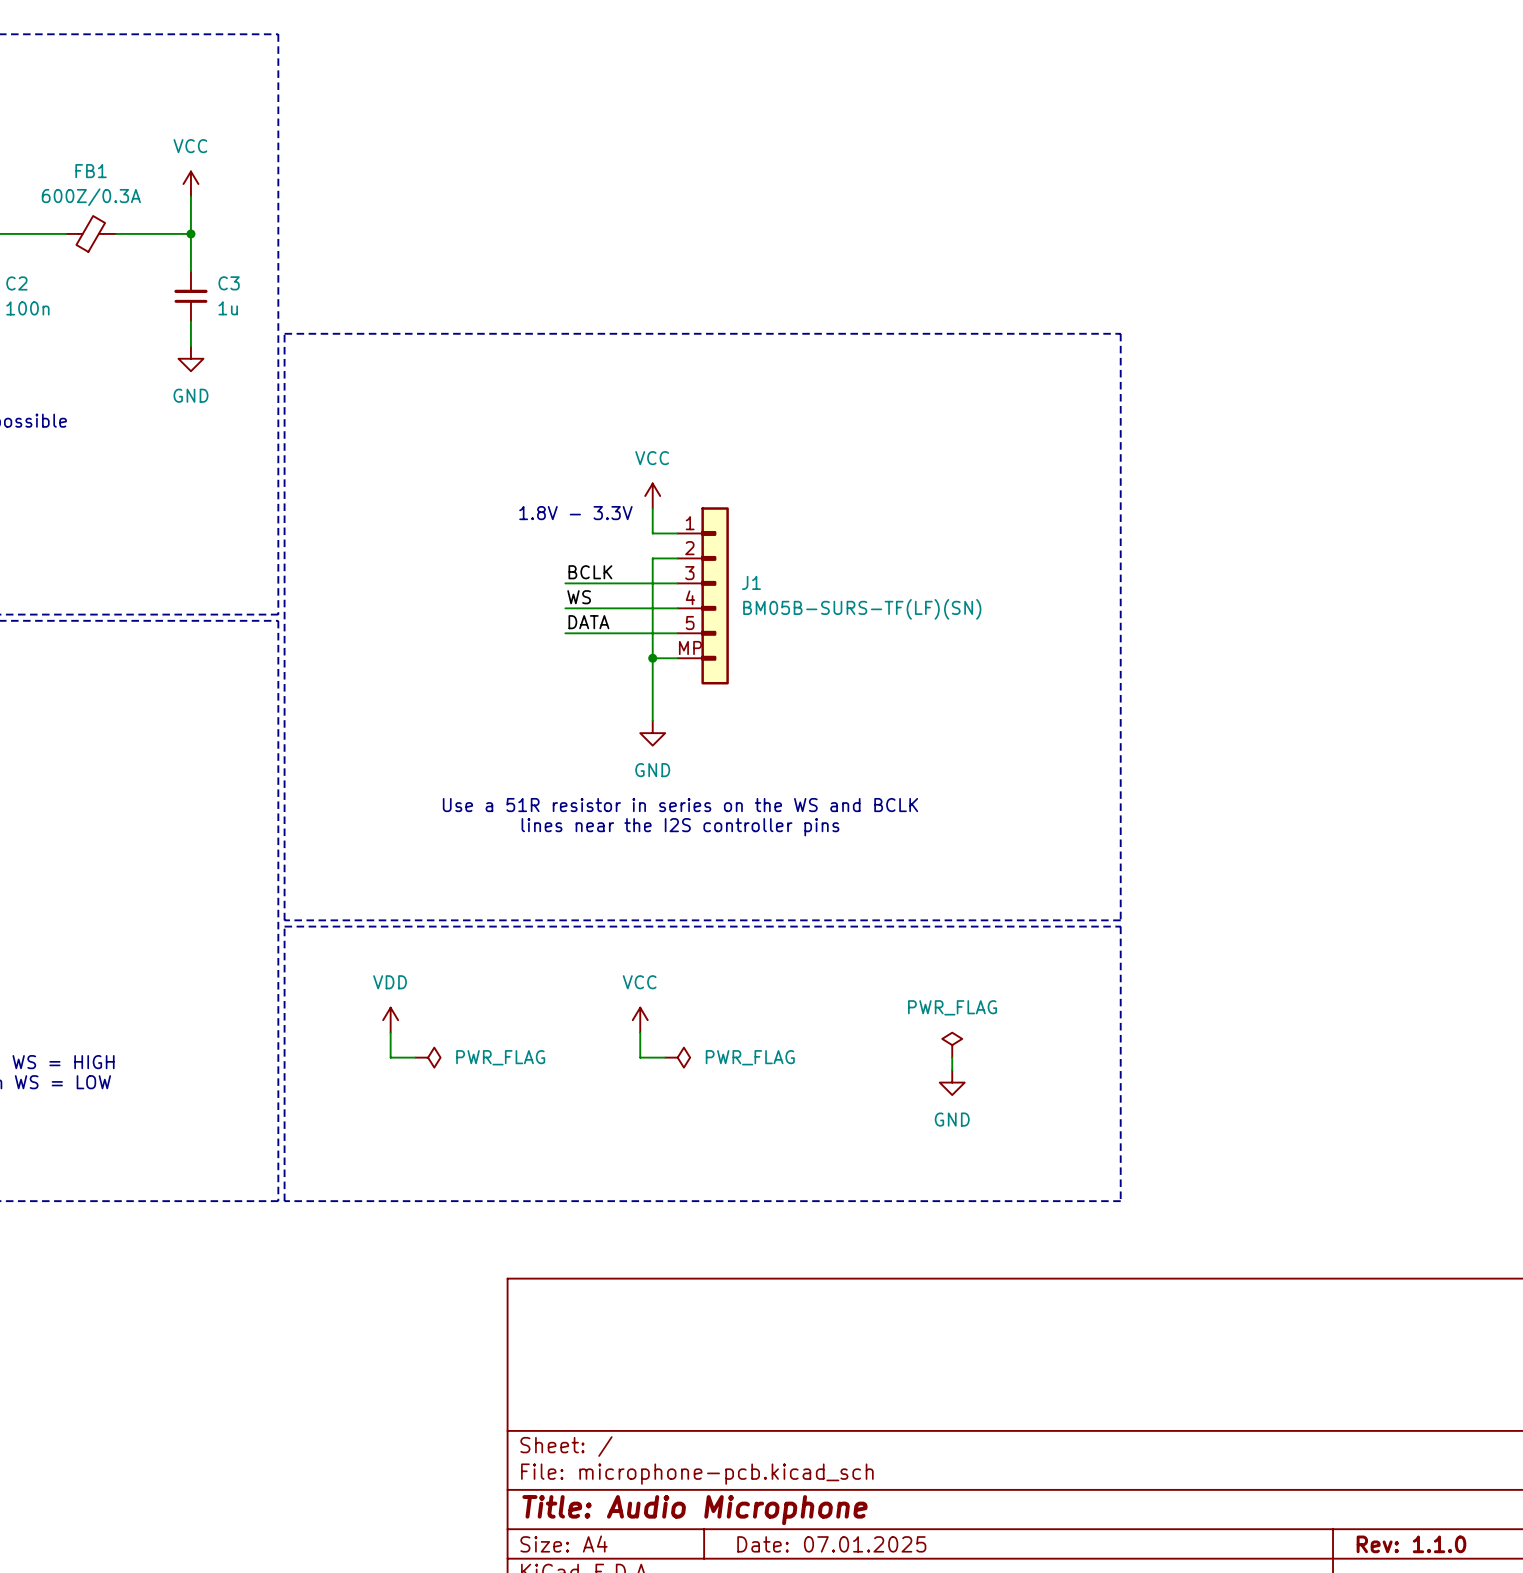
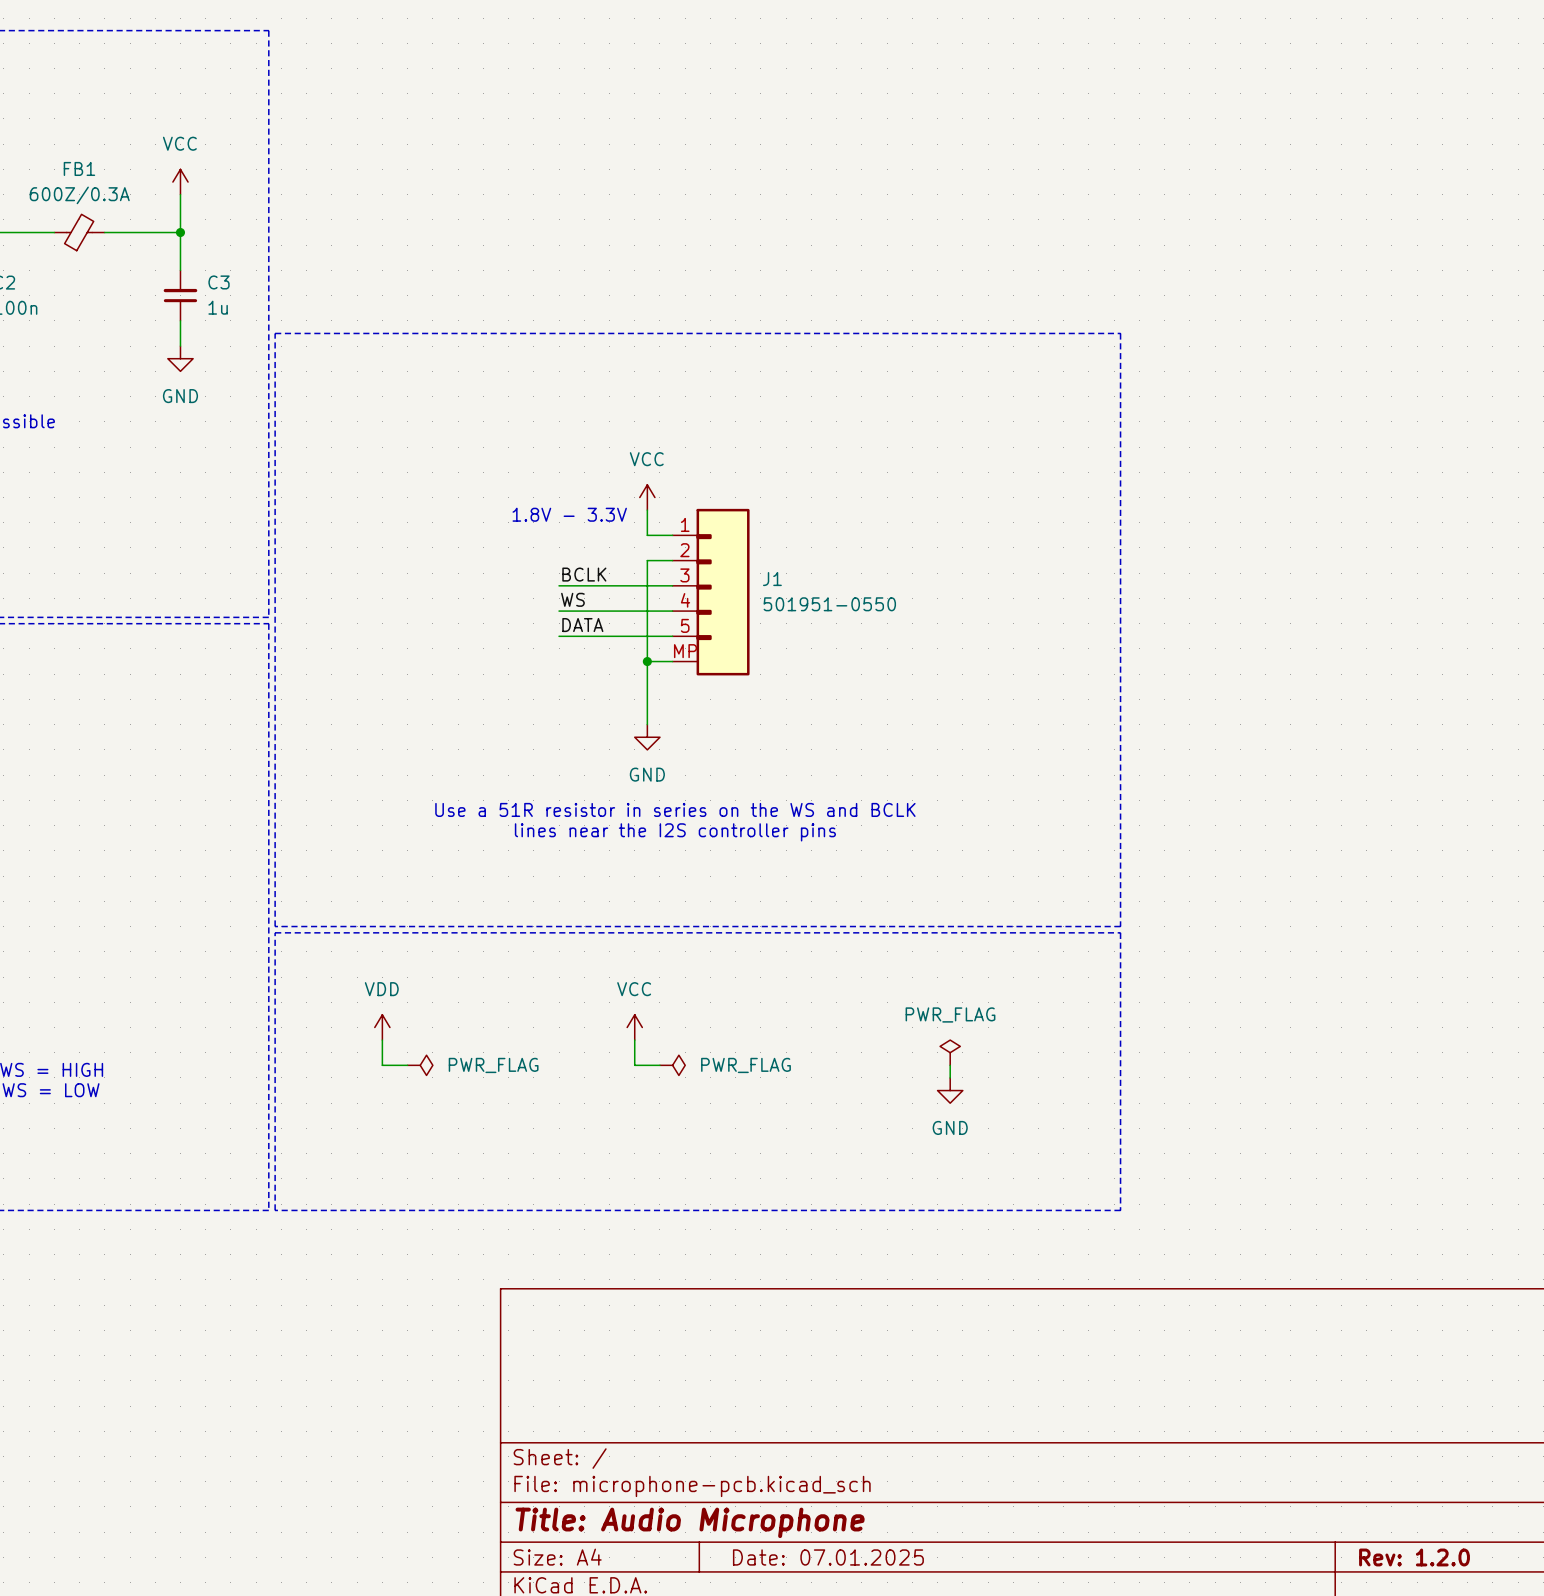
J1 symbol: [677, 507, 729, 685] -> [672, 508, 750, 676]
J1 text: BM05B-SURS-TF(LF)(SN) (862, 609) -> 501951-0550 (829, 604)
title block: Rev: 1.1.0 (1411, 1544) -> Rev: 1.2.0 (1414, 1557)

